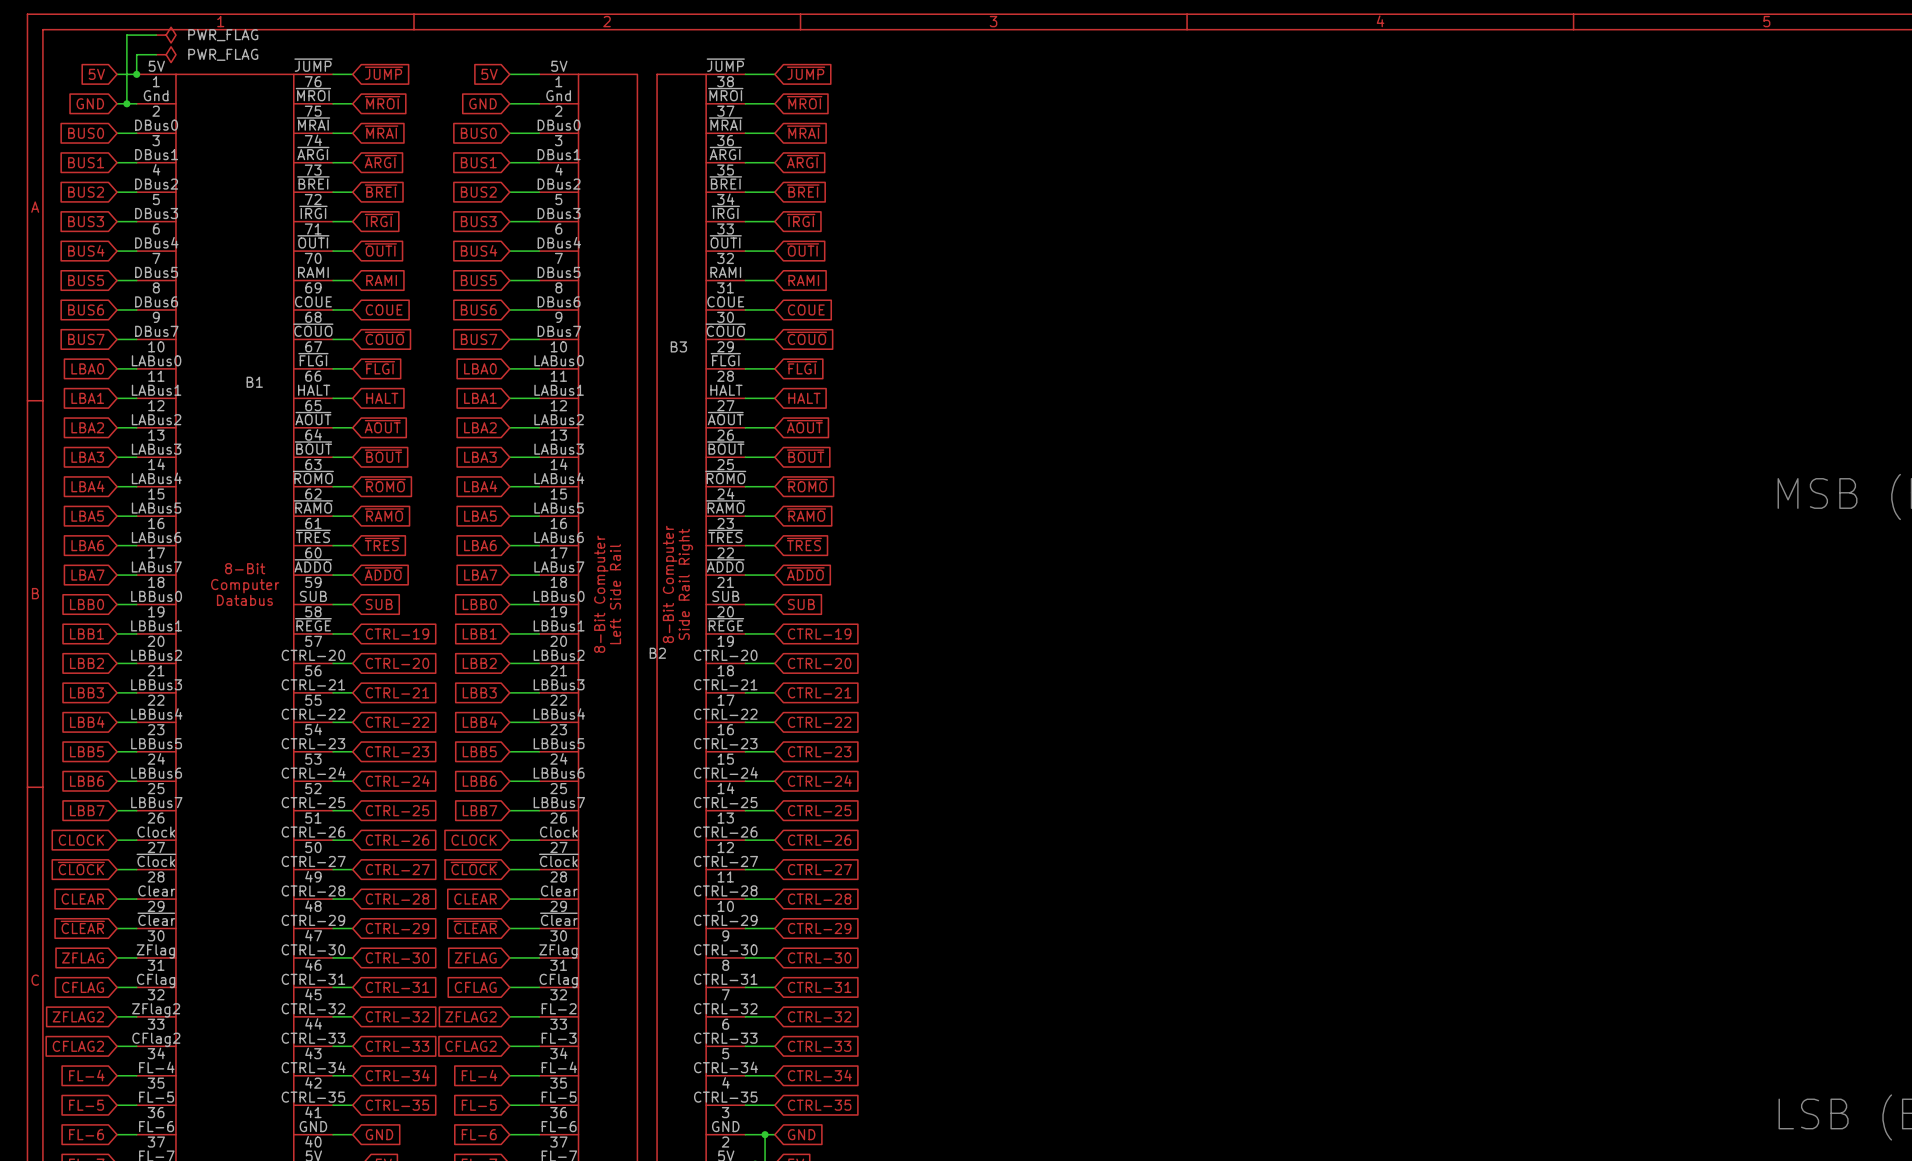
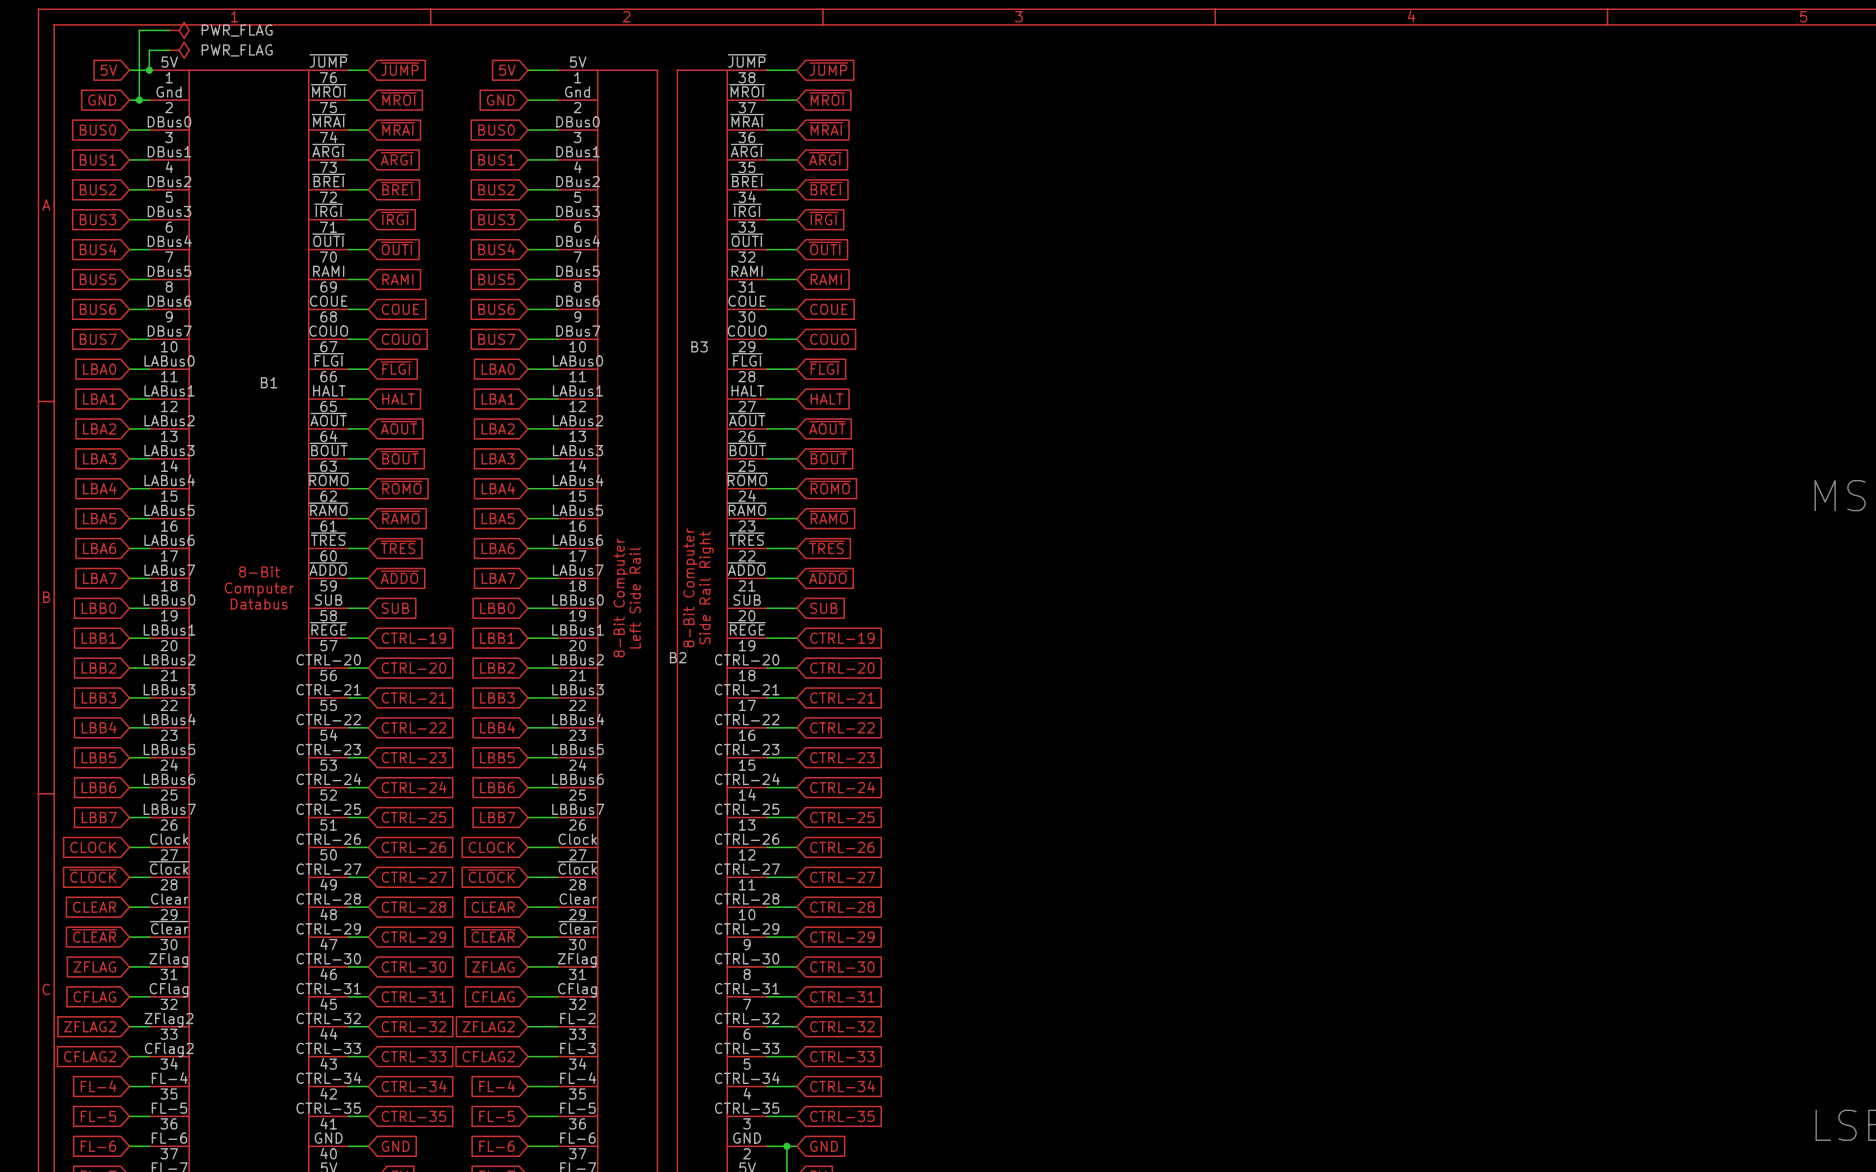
B1 pin name: ~{COUO} (313, 330) -> COUO (328, 331)
B3 pin name: ~{COUO} (725, 330) -> COUO (747, 331)
global label: ~{COUO} (384, 338) -> COUO (401, 339)
global label: ~{COUO} (807, 338) -> COUO (829, 339)

